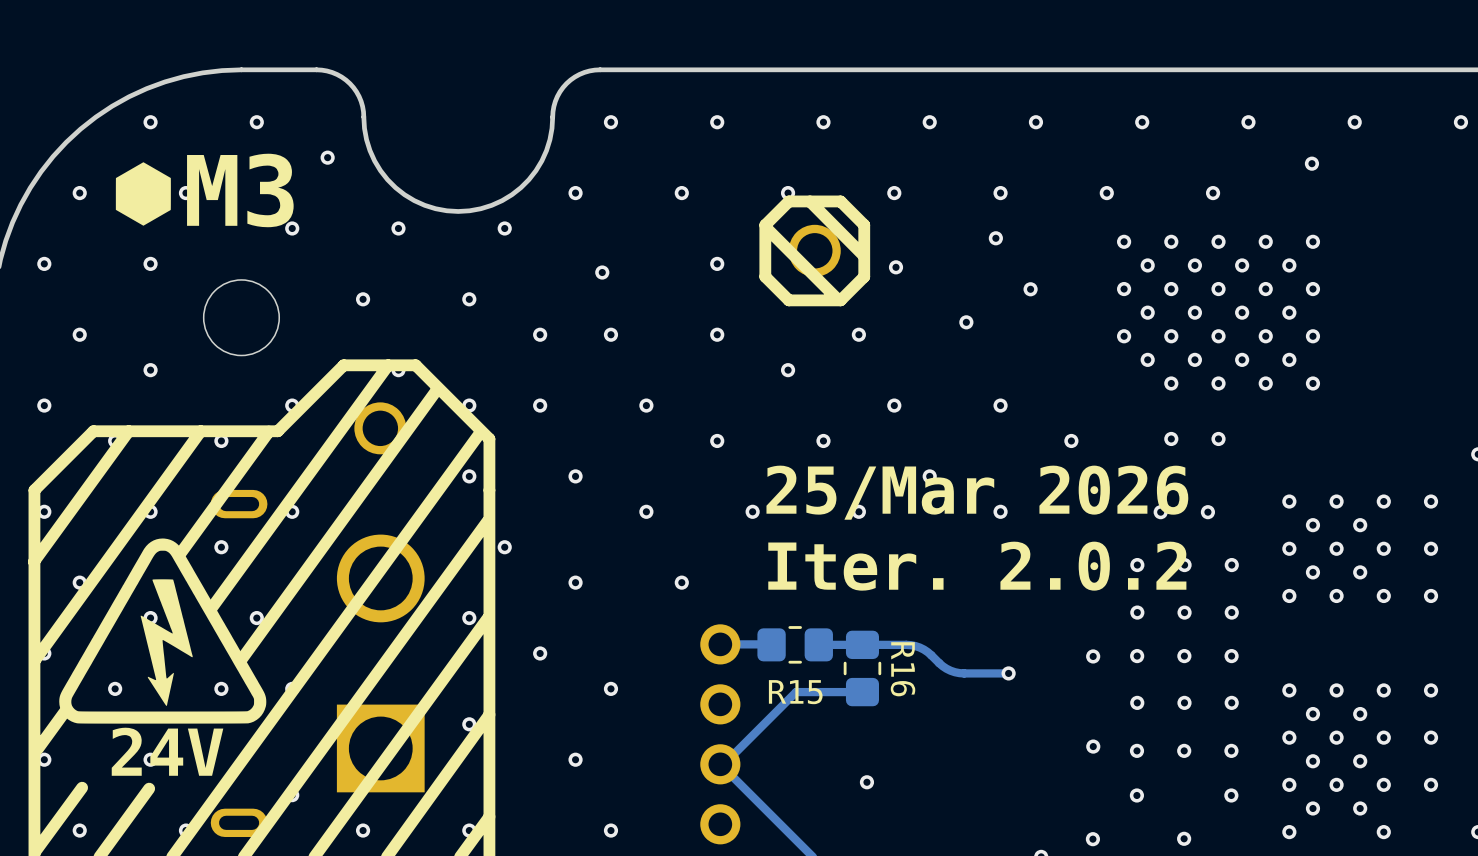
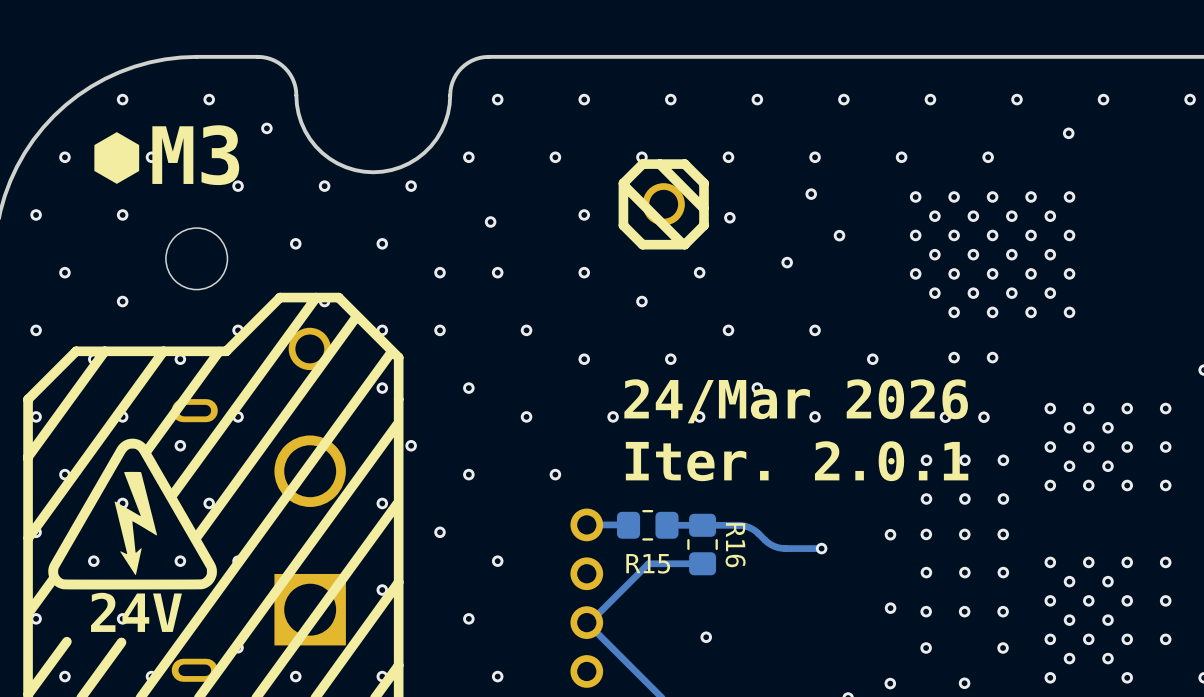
text: 25/Mar 2026 (977, 492) -> 24/Mar 2026 (796, 401)
text: Iter. 2.0.2 (977, 566) -> Iter. 2.0.1 (797, 461)

